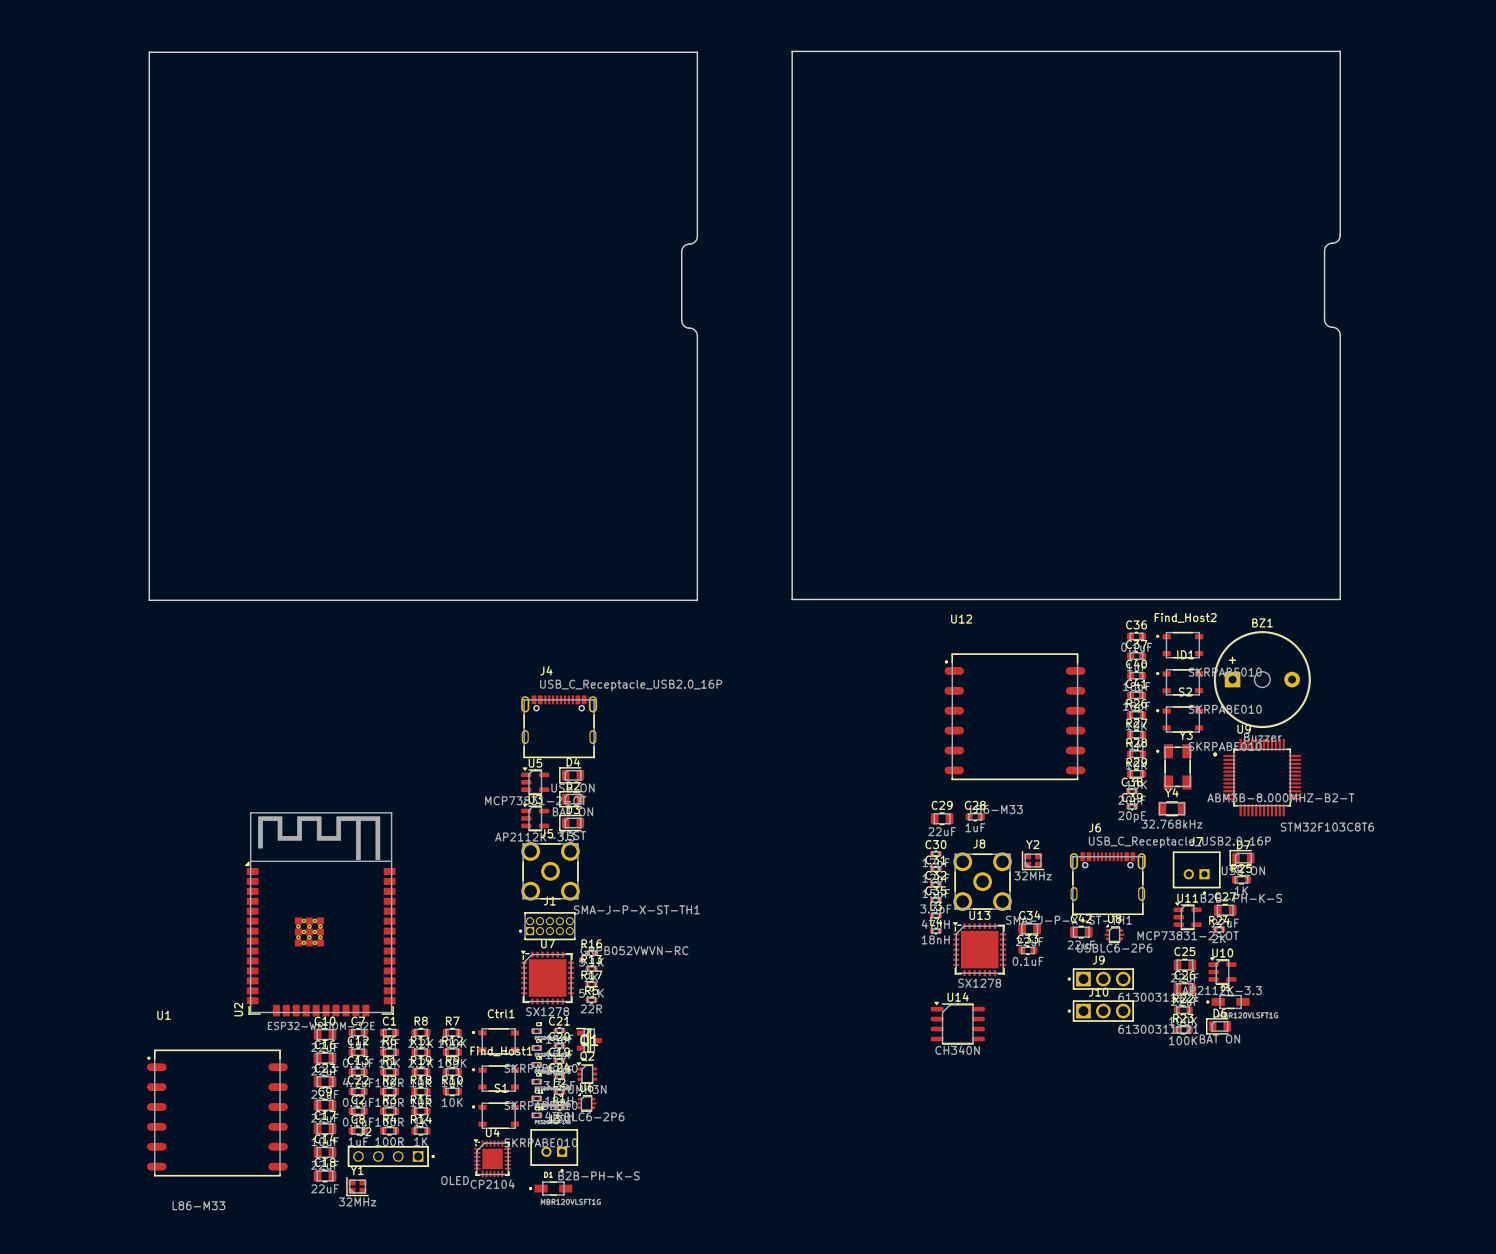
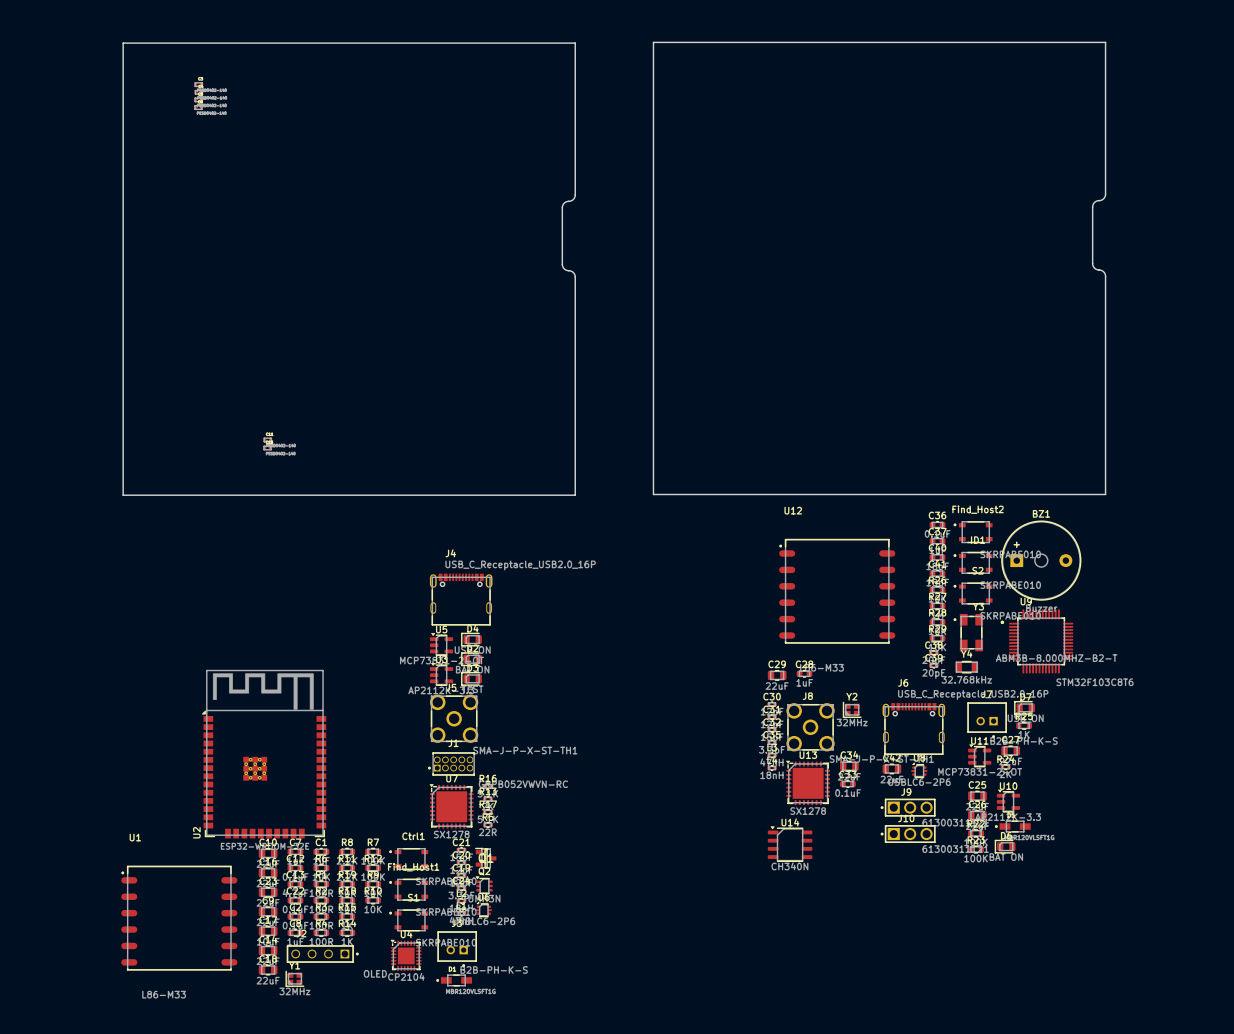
part position: (536, 1031) -> (198, 84)
part position: (536, 1048) -> (198, 92)
part position: (536, 1064) -> (198, 99)
part position: (536, 1081) -> (198, 107)
part position: (536, 1098) -> (267, 439)
part position: (536, 1115) -> (267, 447)

